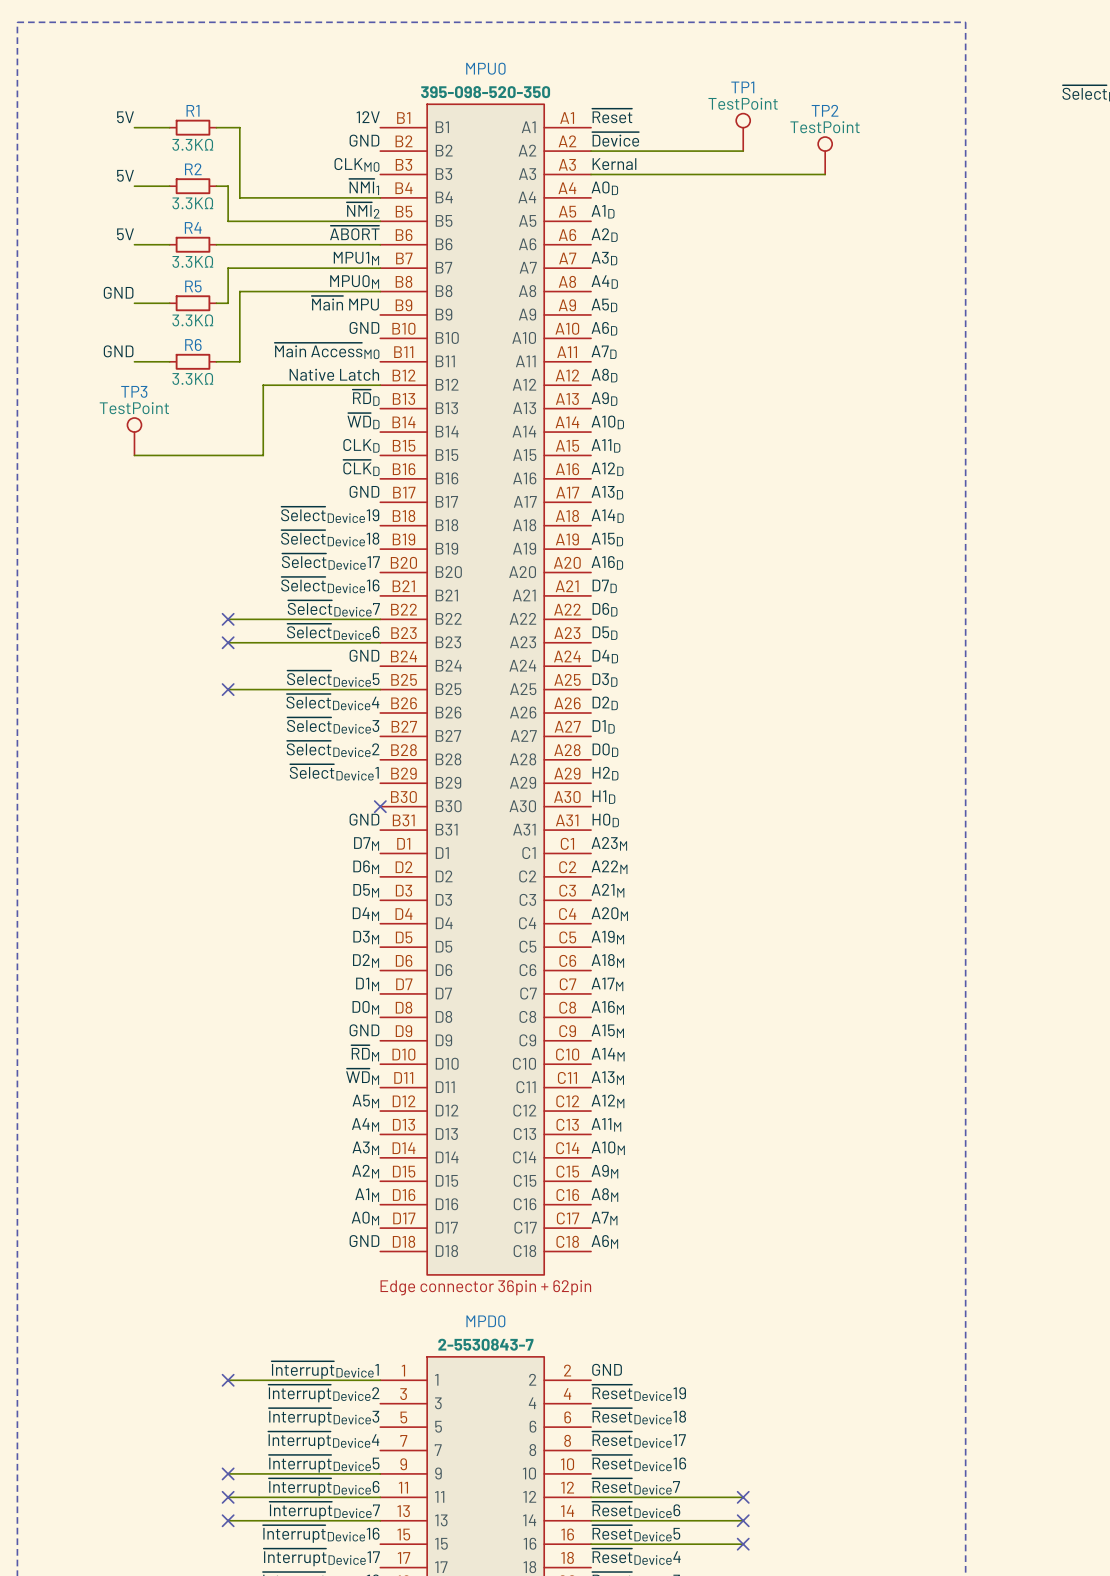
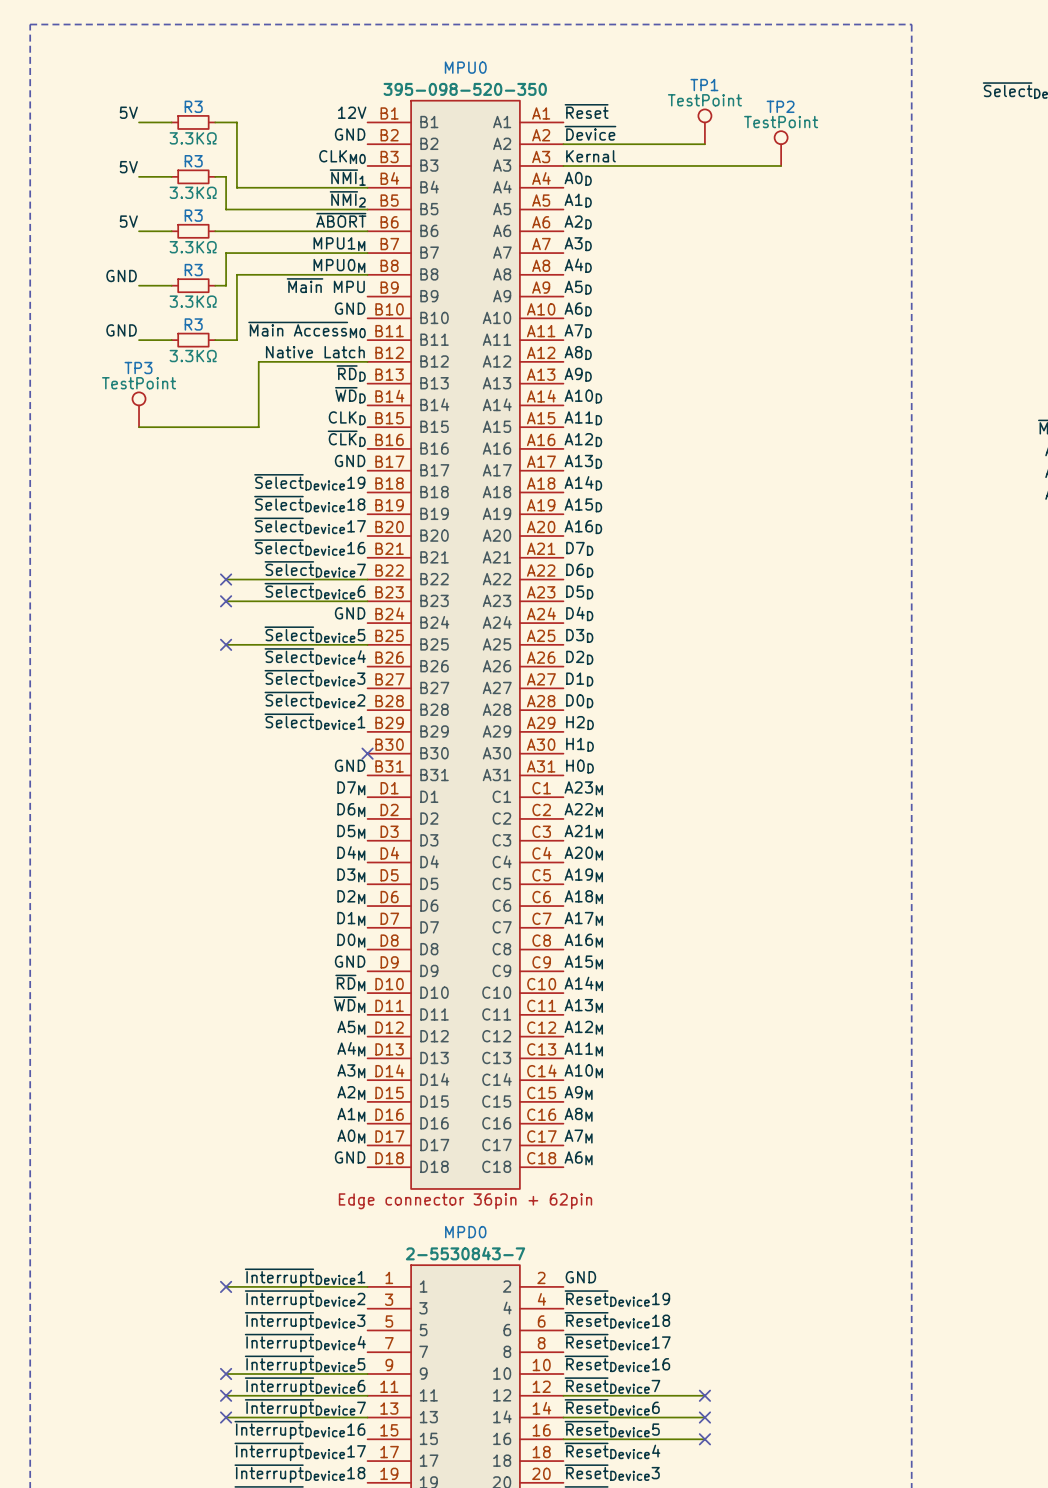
R1 name: R1 (193, 110) -> R3 (193, 106)
R2 name: R2 (193, 169) -> R3 (193, 161)
R4 name: R4 (193, 227) -> R3 (193, 215)
R5 name: R5 (193, 286) -> R3 (193, 270)
R6 name: R6 (193, 344) -> R3 (193, 324)

